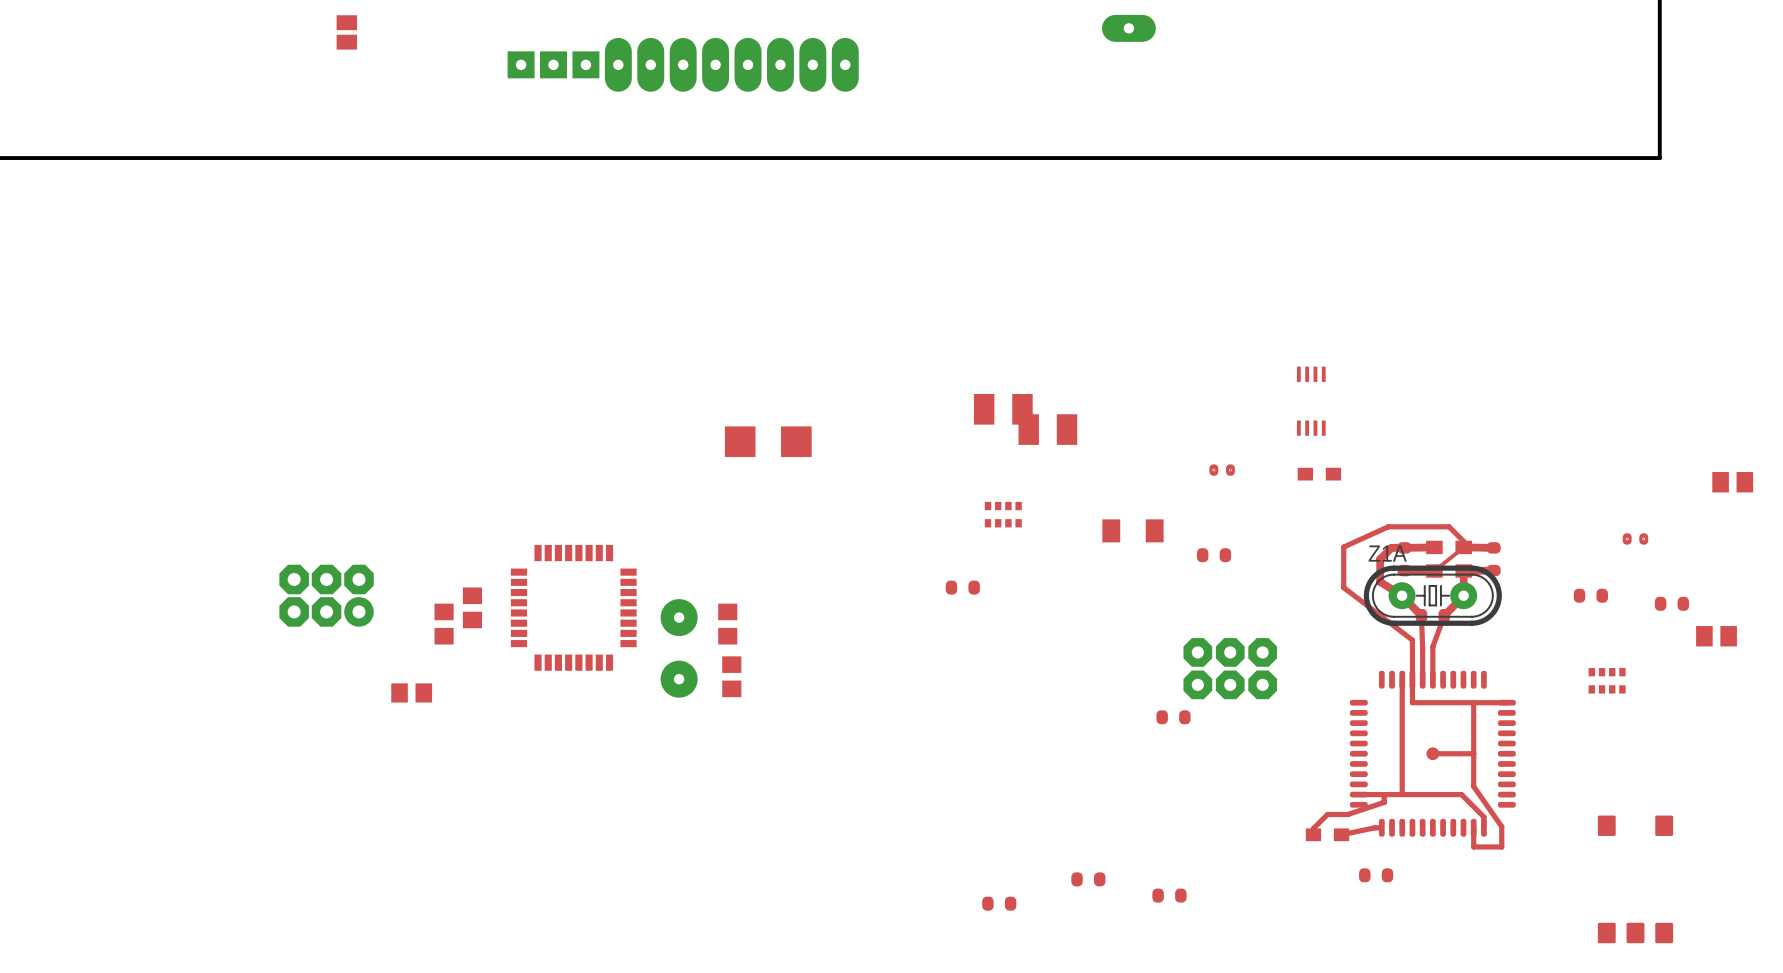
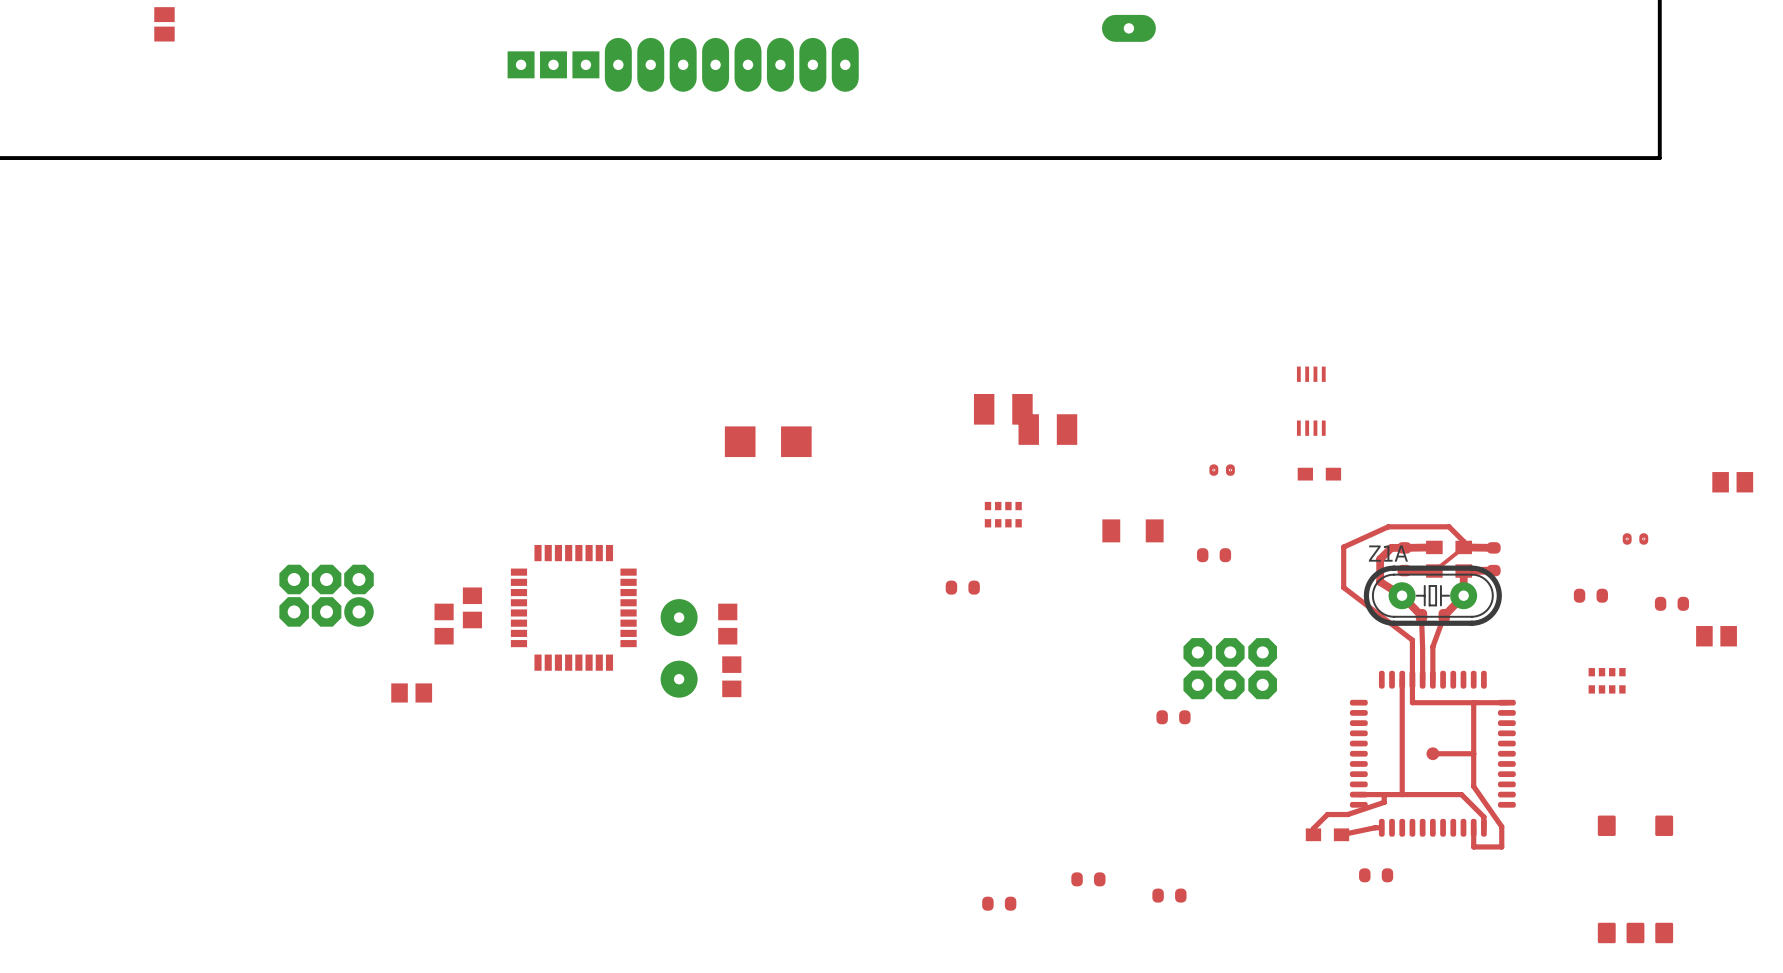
part: none -> (164, 24)
part: (346, 32) -> none

